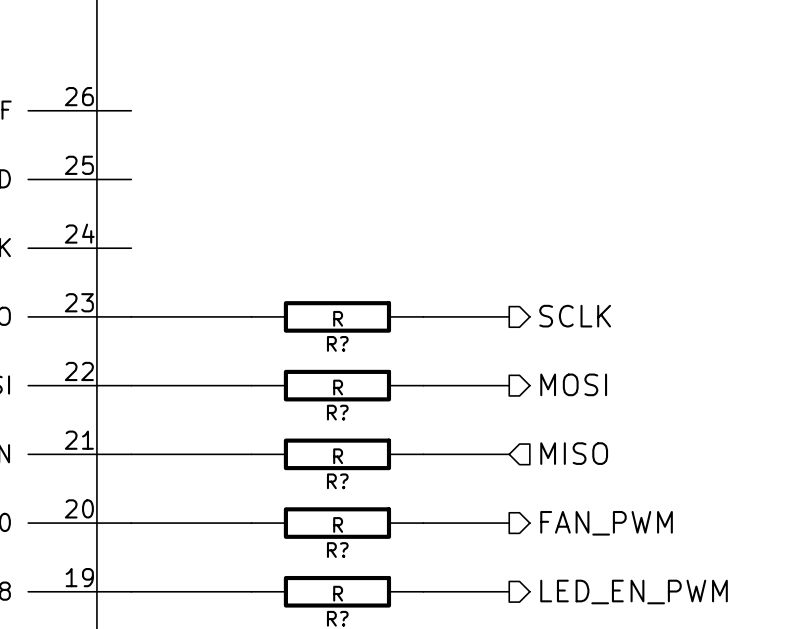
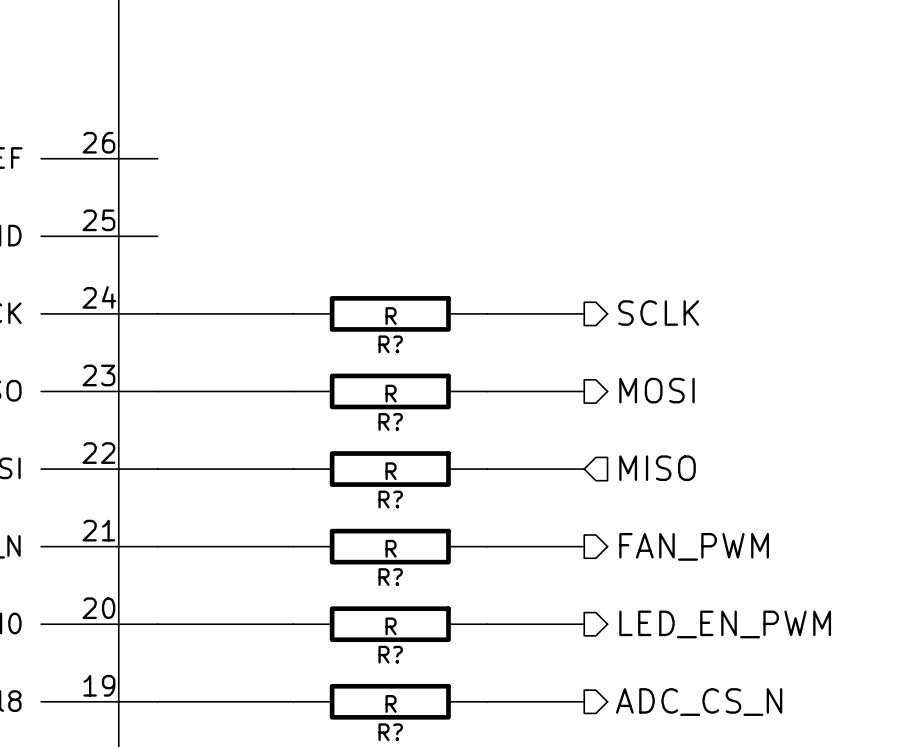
hierarchical label: none -> SCLK (658, 313)
wire: none -> (157, 313) (293, 313)
R?: none -> R (390, 313)
wire: none -> (487, 313) (584, 313)
hierarchical label: SCLK (575, 316) -> MOSI (656, 390)
hierarchical label shape: output (573, 384) -> input (657, 468)
hierarchical label: MOSI (573, 384) -> MISO (657, 468)
hierarchical label shape: input (574, 453) -> output (694, 546)
hierarchical label: MISO (574, 453) -> FAN_PWM (694, 546)
hierarchical label: FAN_PWM (606, 523) -> LED_EN_PWM (725, 624)
hierarchical label: LED_EN_PWM (634, 591) -> ADC_CS_N (699, 702)

